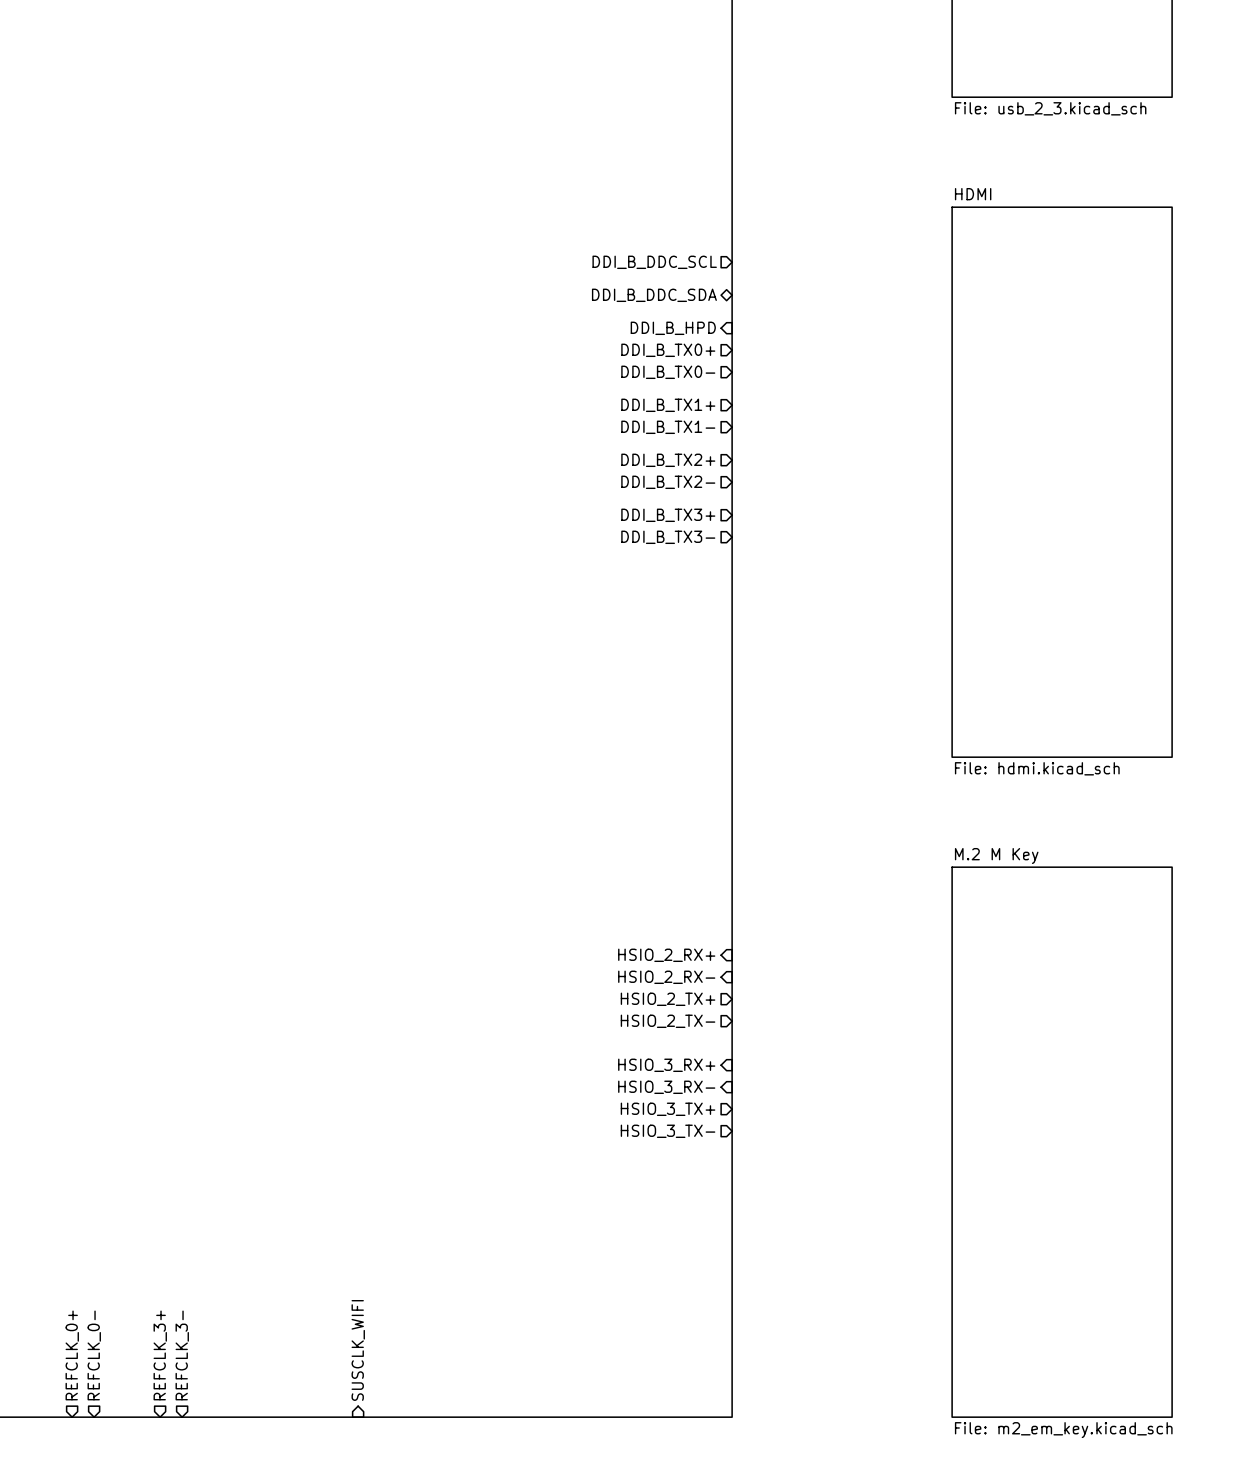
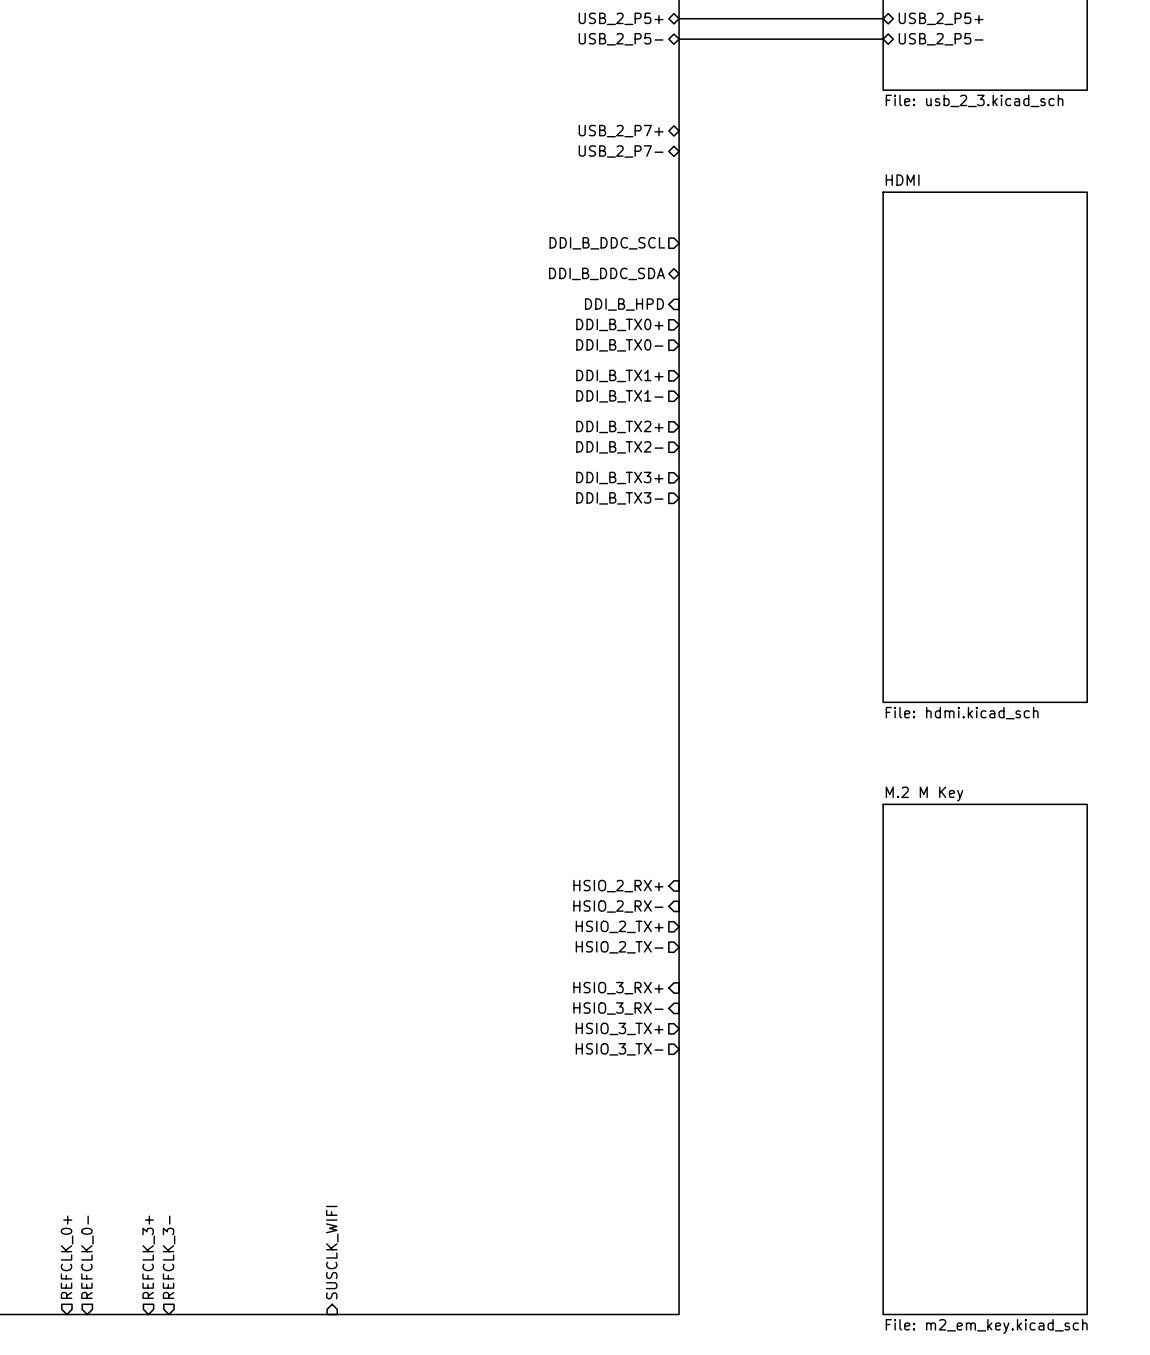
sheet pin: none -> USB_2_P5+ (621, 18)
wire: none -> (679, 18) (883, 18)
sheet pin: none -> USB_2_P5+ (941, 18)
sheet pin: none -> USB_2_P5- (621, 39)
wire: none -> (679, 39) (883, 39)
sheet pin: none -> USB_2_P5- (941, 39)
sheet pin: none -> USB_2_P7+ (621, 131)
sheet pin: none -> USB_2_P7- (621, 151)

